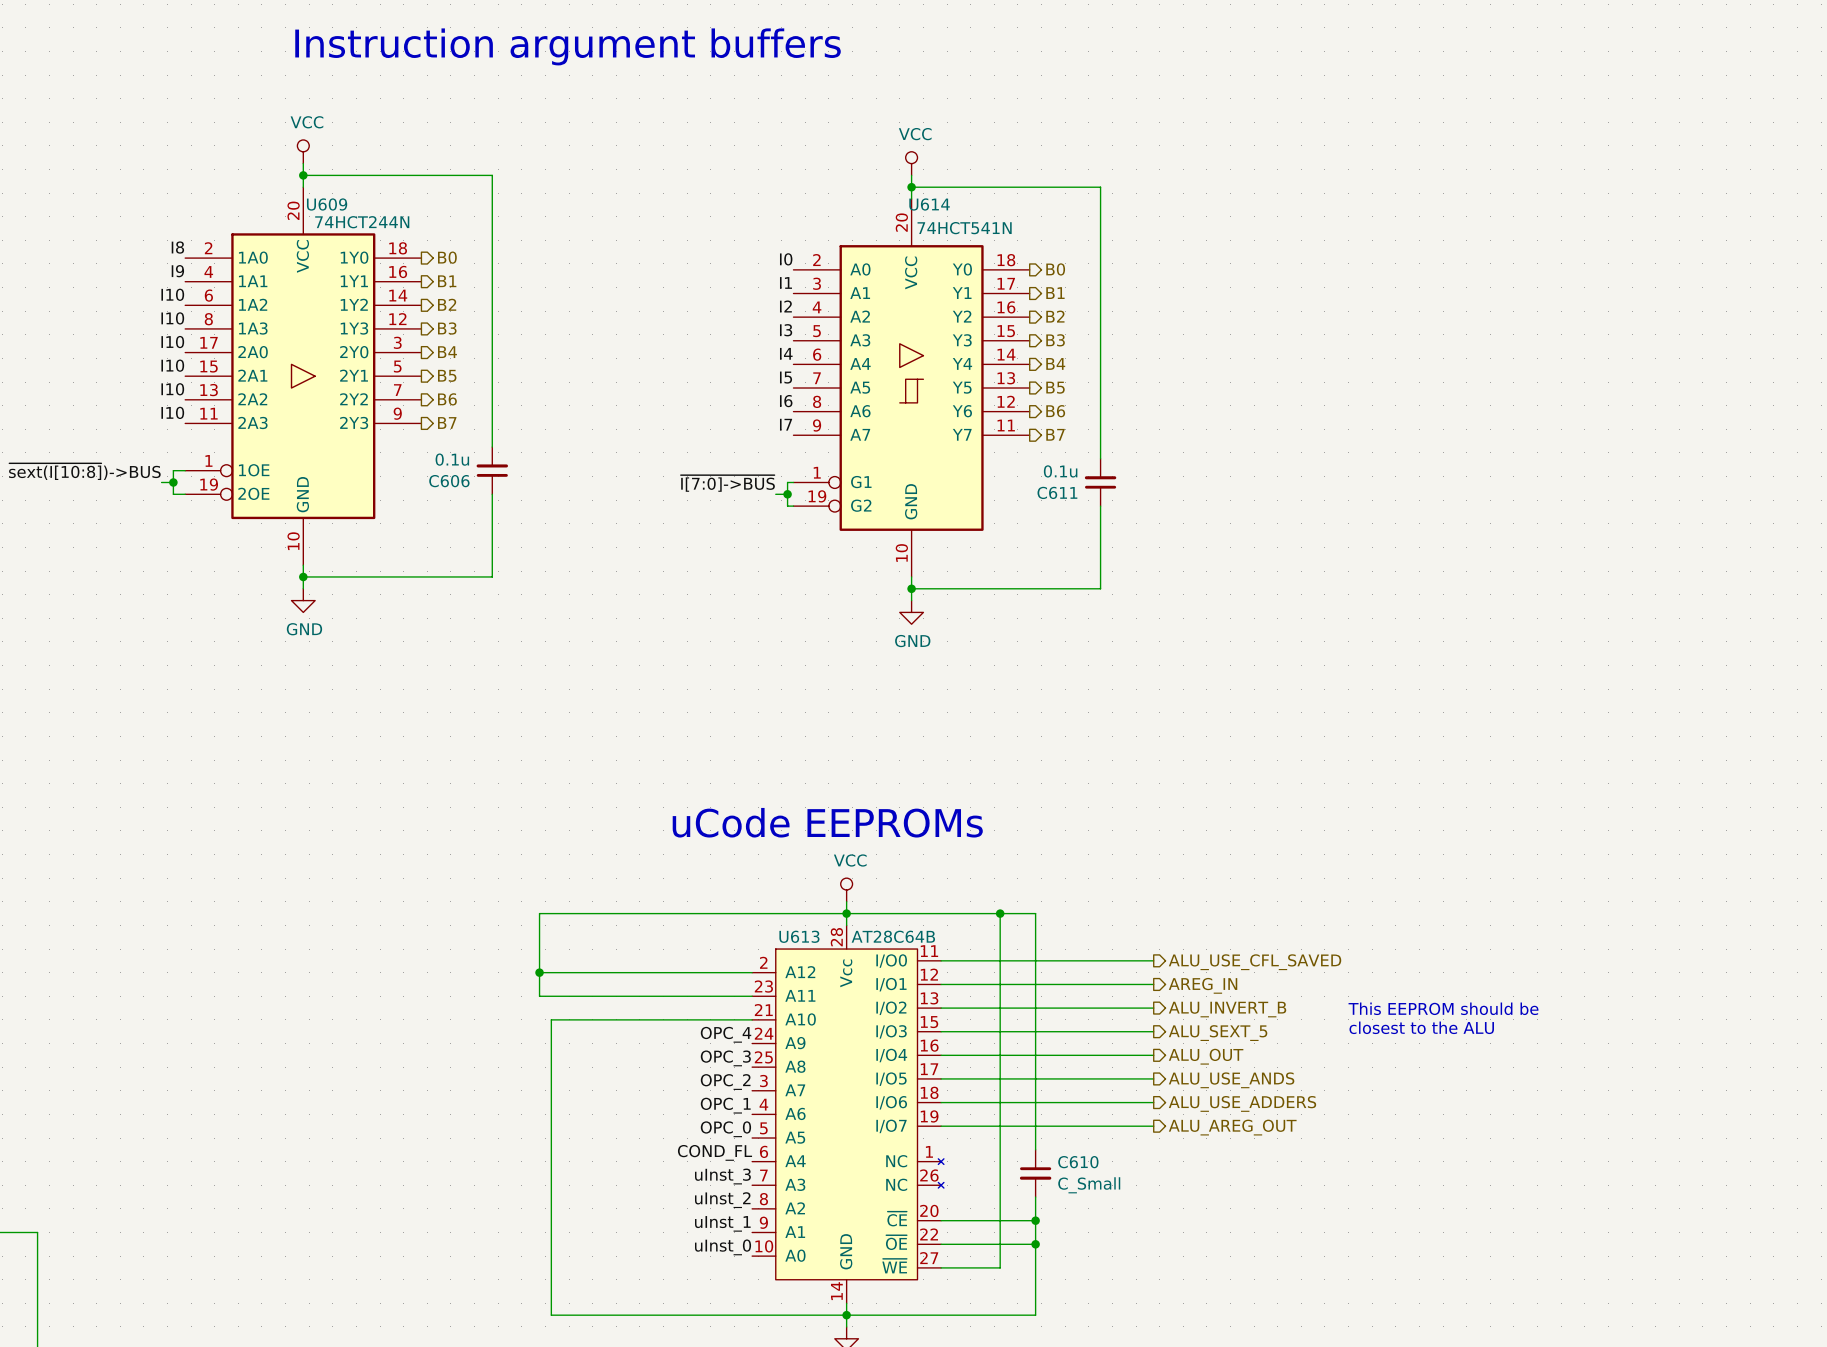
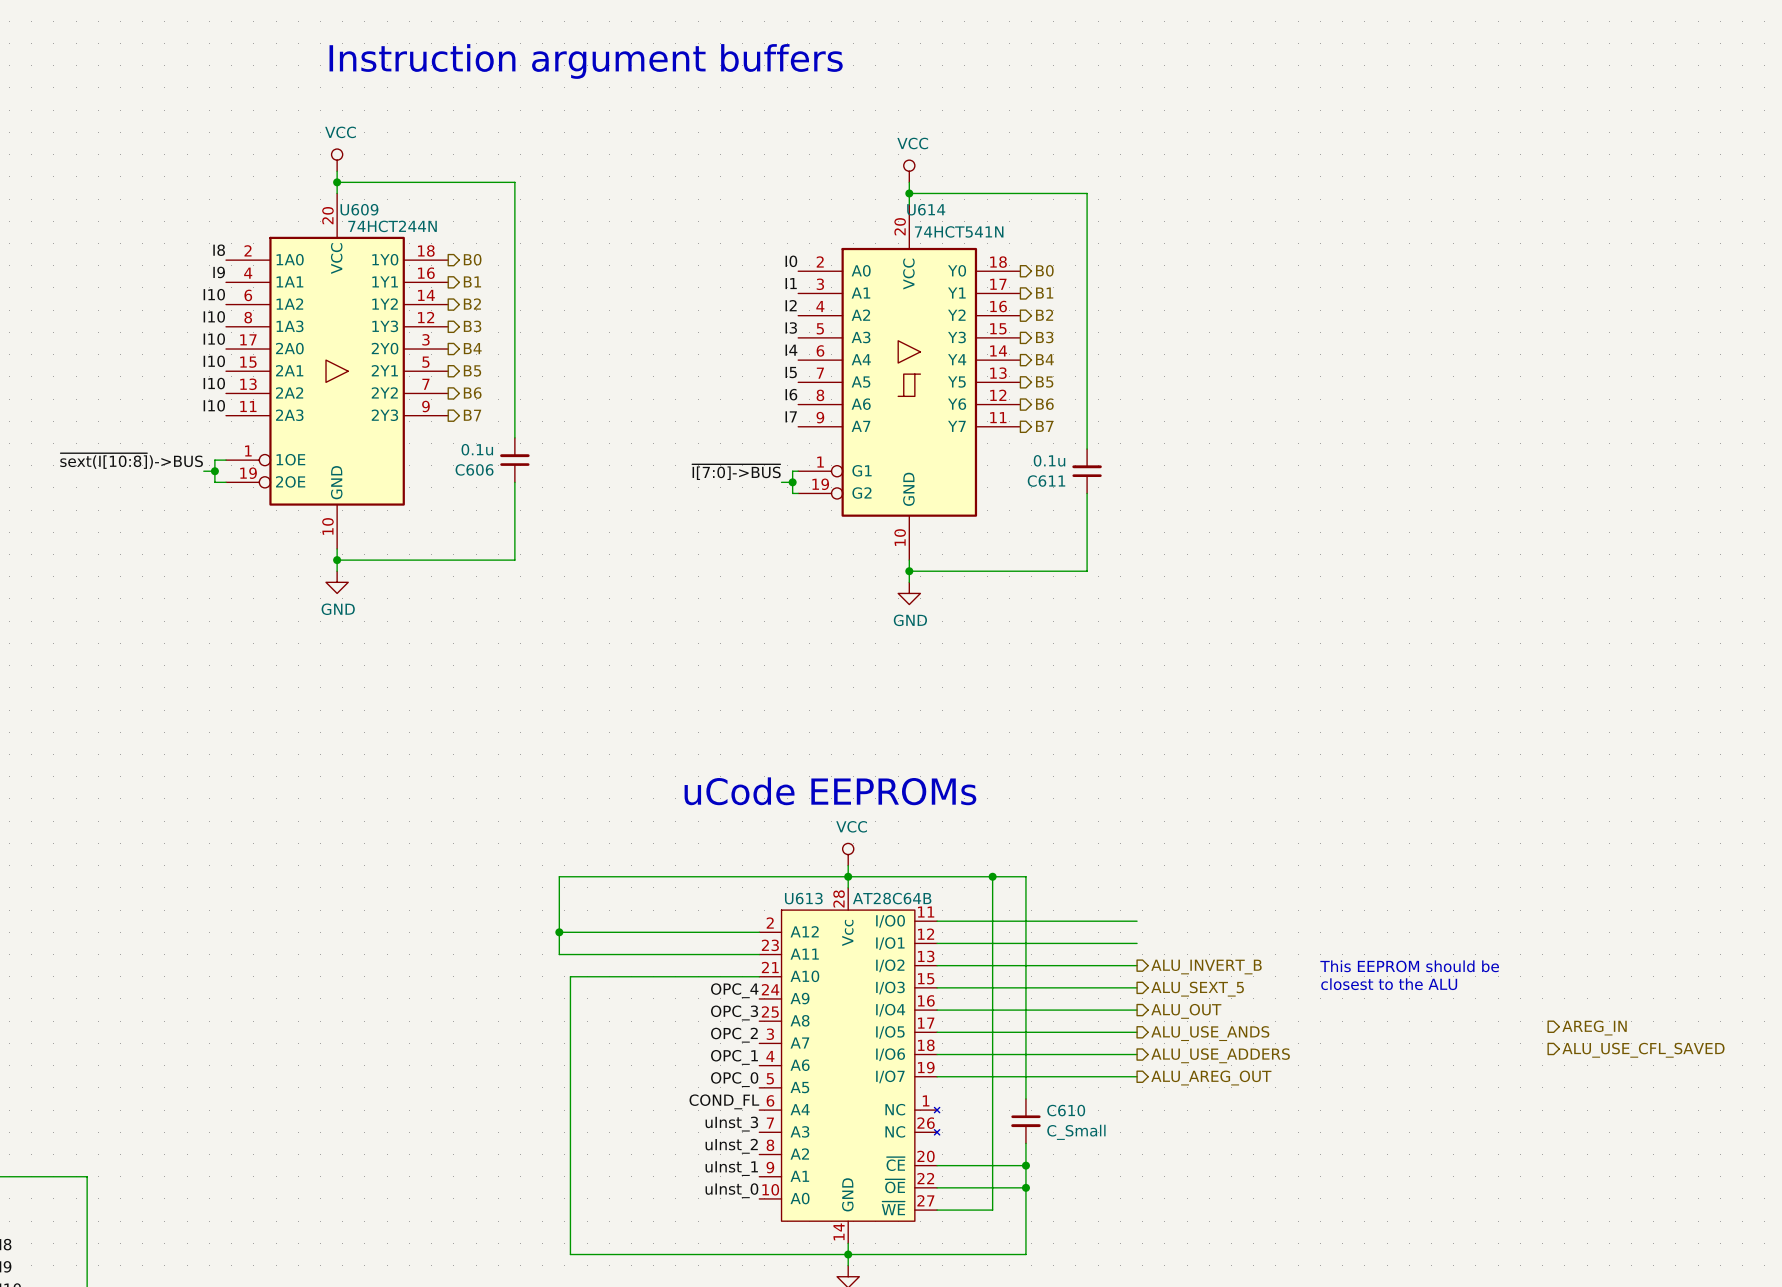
hierarchical label: ALU_USE_CFL_SAVED (1255, 962) -> none
hierarchical label: AREG_IN (1203, 985) -> none
hierarchical label: none -> AREG_IN (1594, 1028)
hierarchical label: none -> ALU_USE_CFL_SAVED (1643, 1050)

